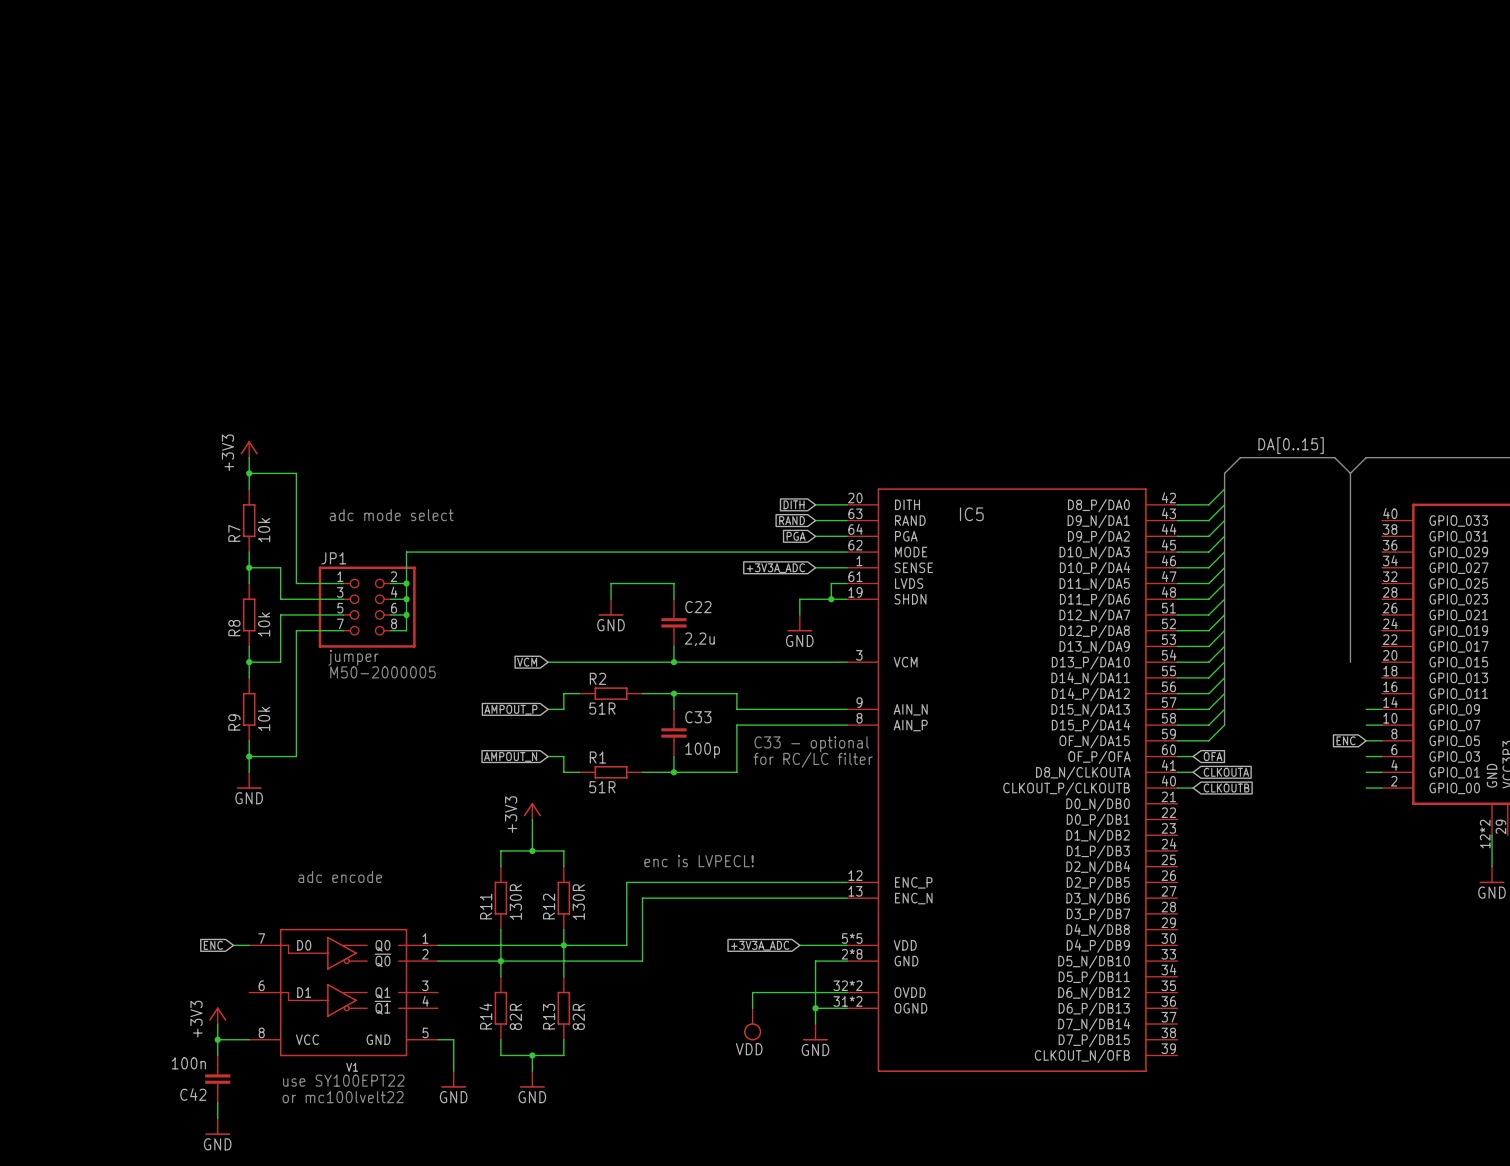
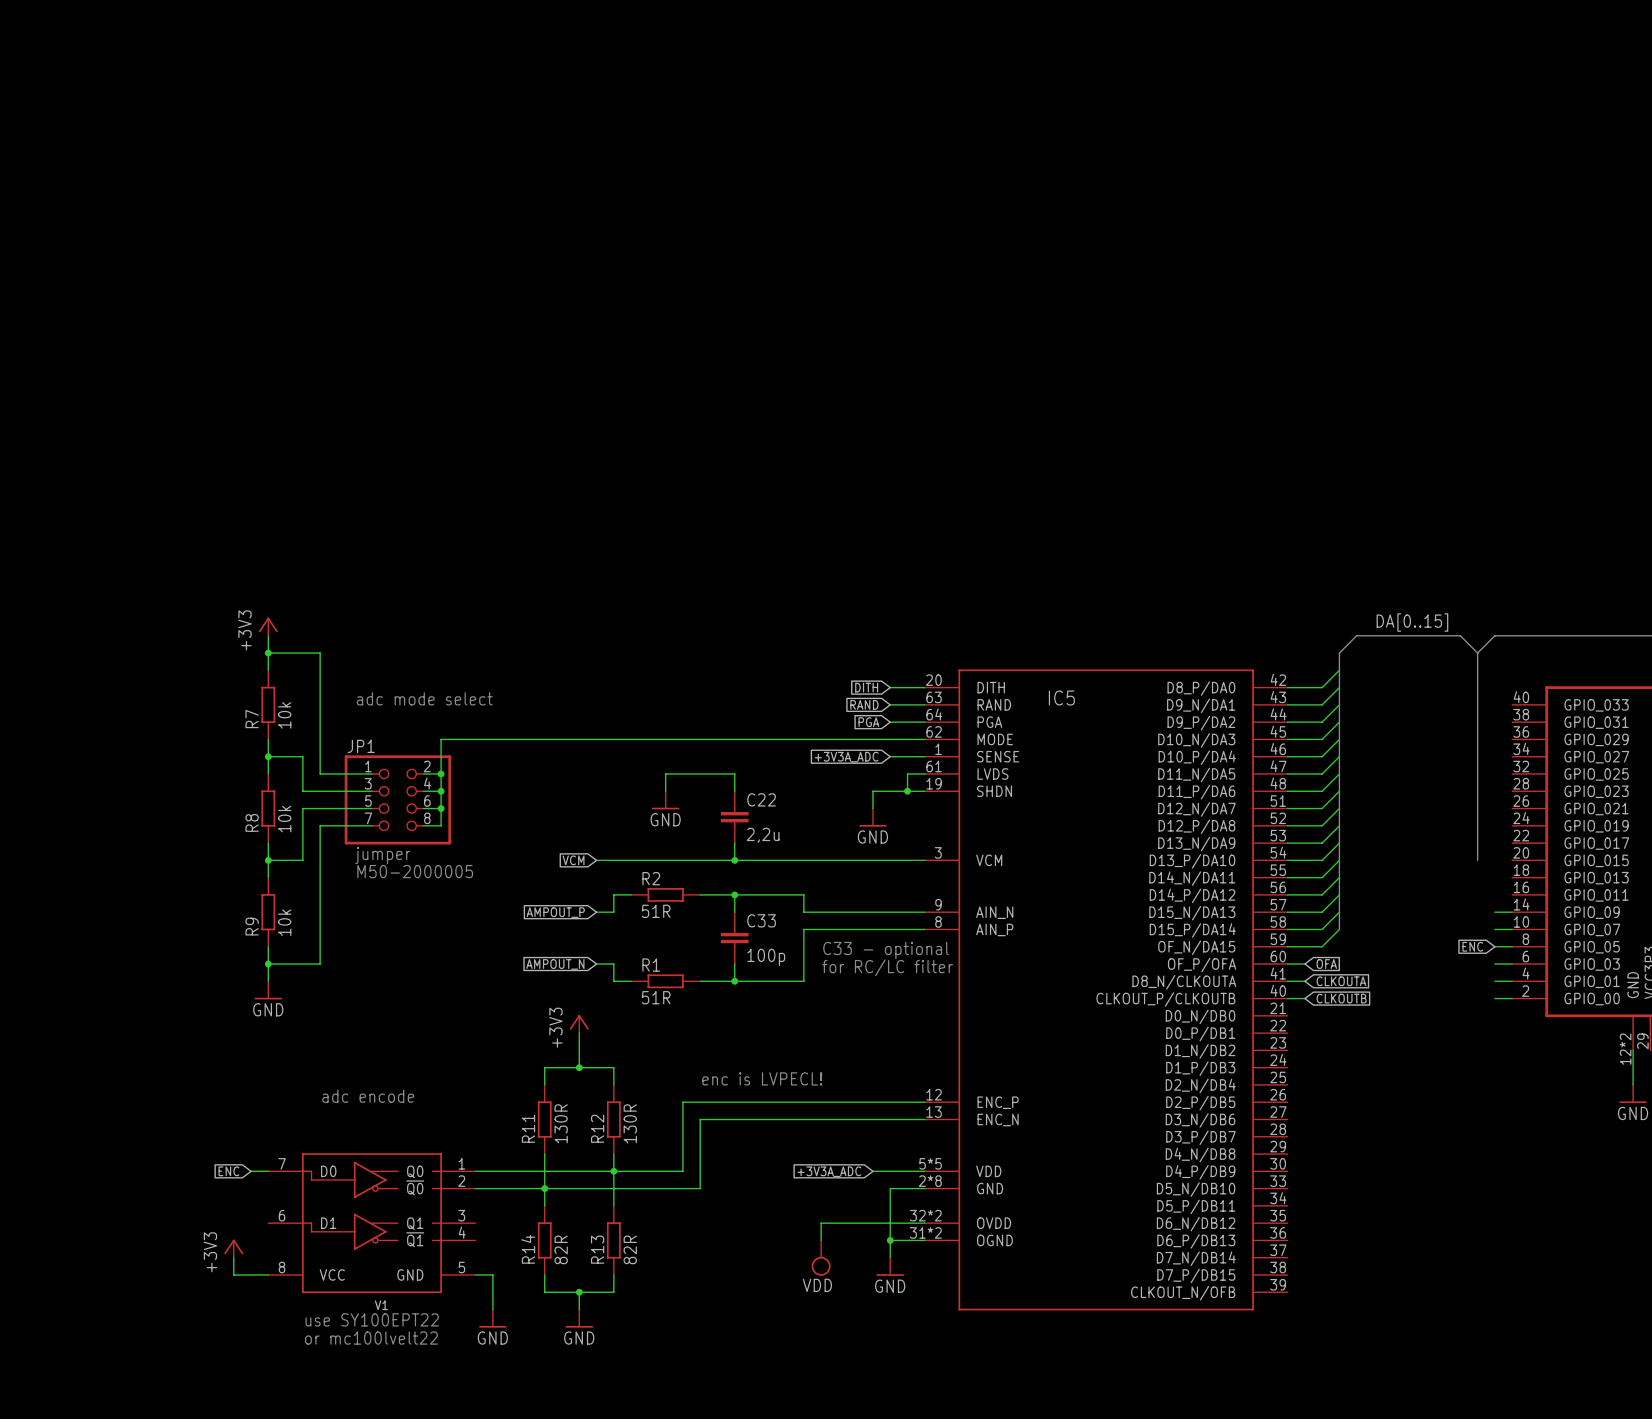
wire: (217, 1039) (217, 1055) -> none
junction: (217, 1039) -> none
C42: 100n (217, 1079) -> none
wire: (217, 1102) (217, 1118) -> none
power symbol: GND (217, 1126) -> none

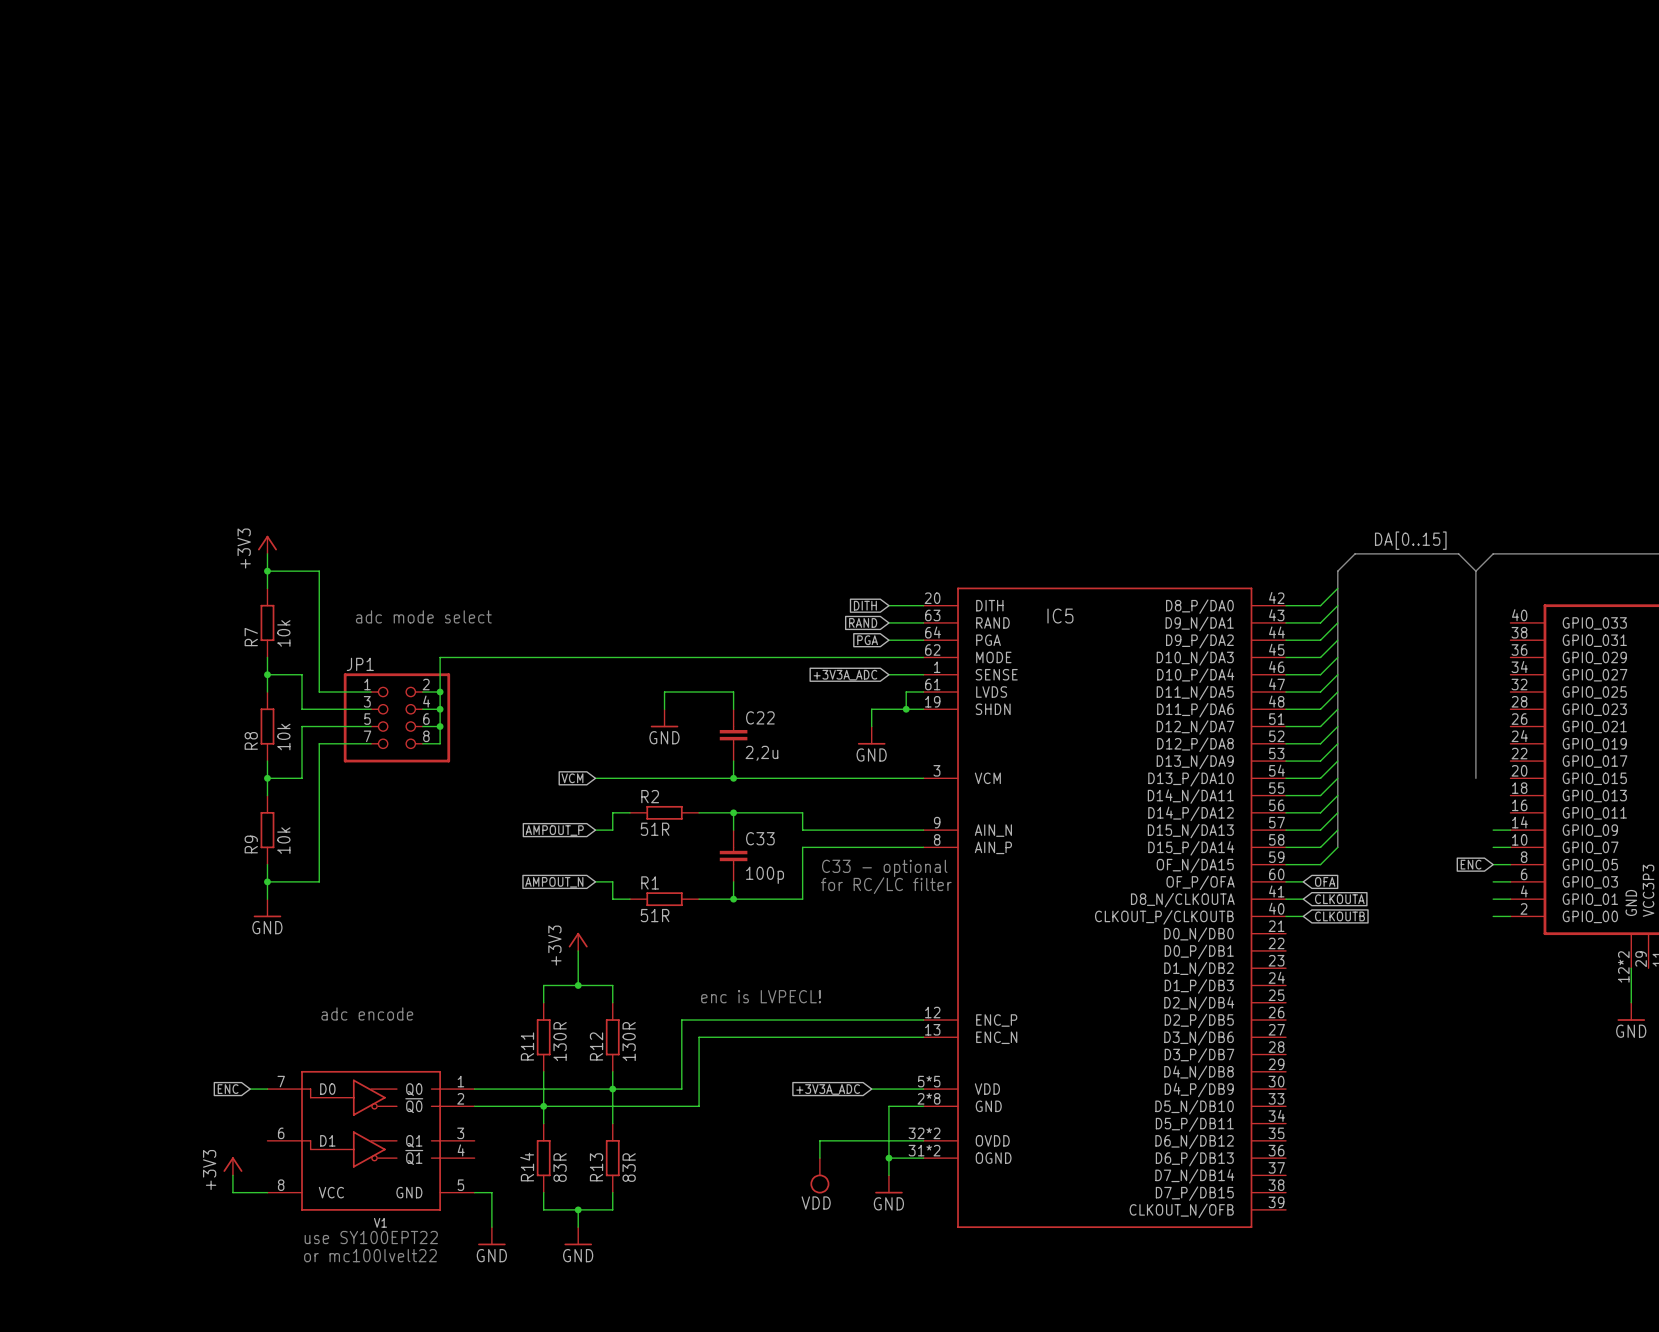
text: jumper (382, 855) -> none
text: M50-2000005 (415, 871) -> none
R14 value: 82R (561, 1249) -> 83R (560, 1167)
R13 value: 82R (630, 1249) -> 83R (629, 1167)

